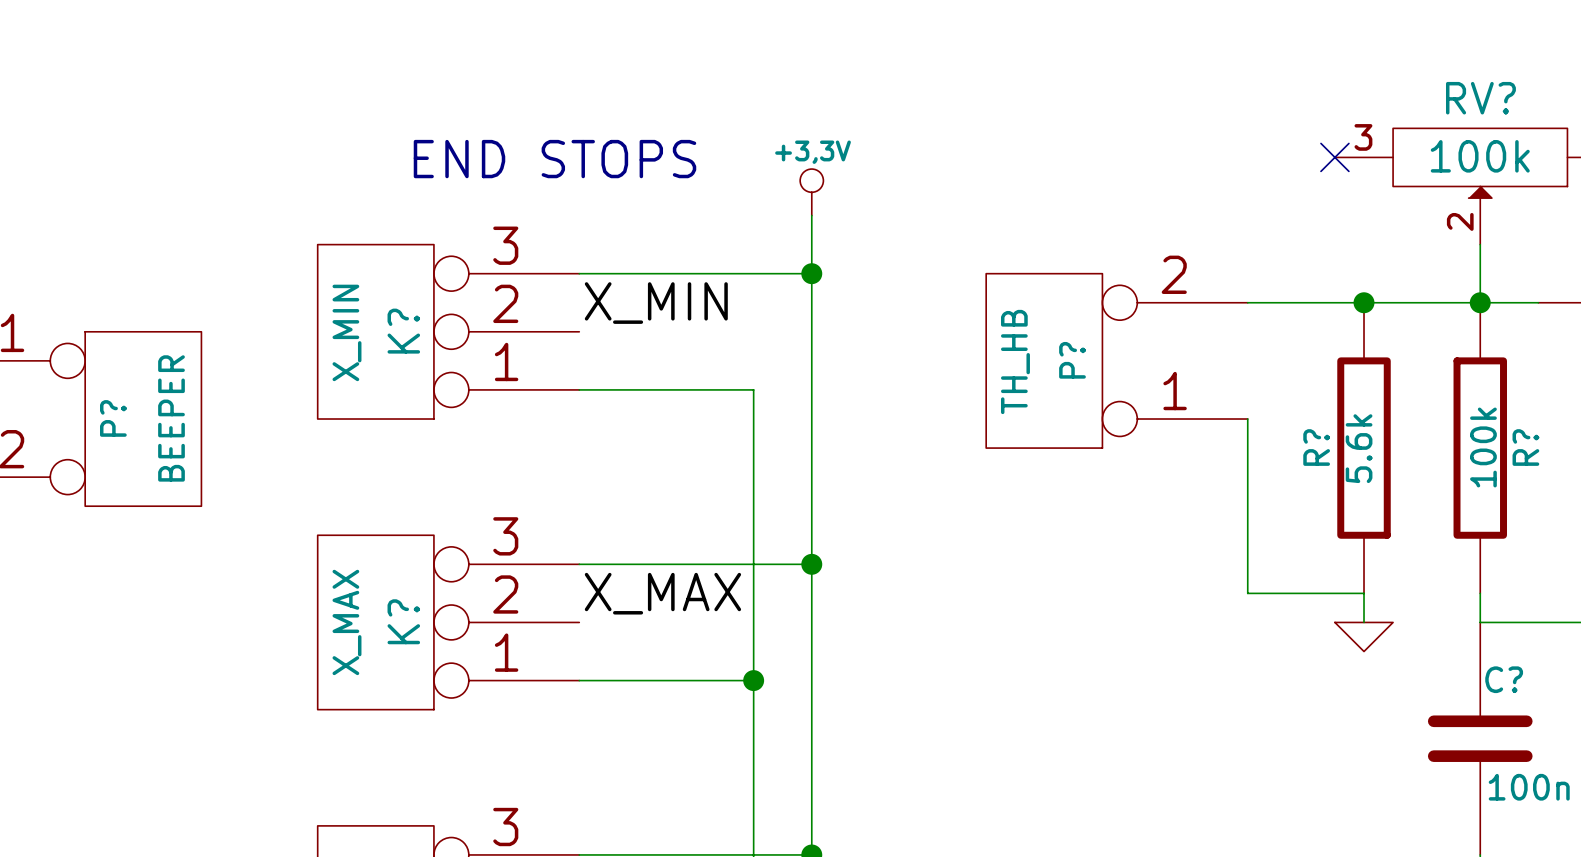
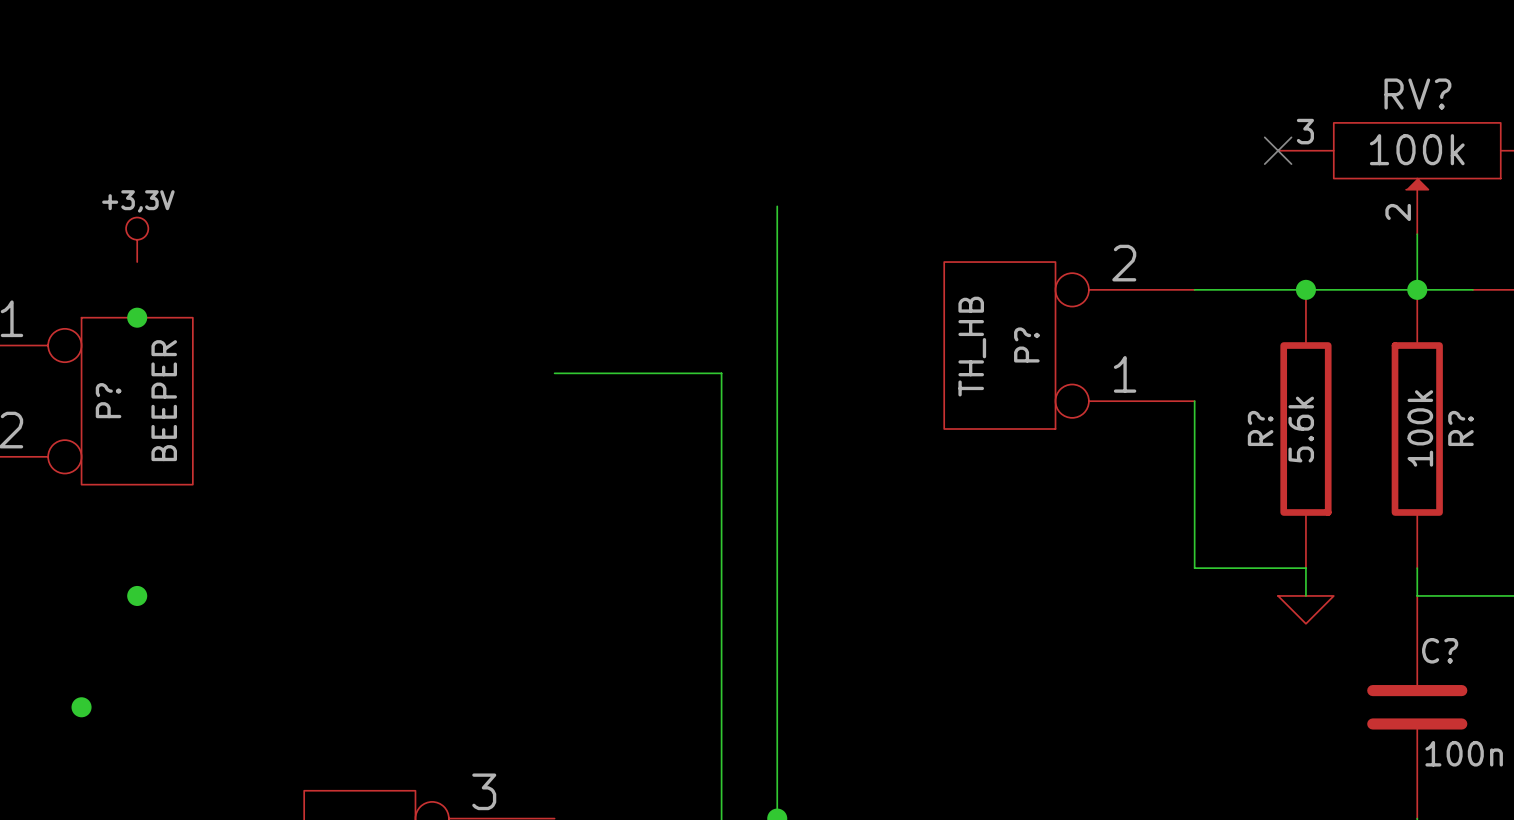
text: END STOPS (554, 159) -> none
power symbol: +3,3V (811, 192) -> none
power symbol: none -> +3,3V (137, 239)
wire: (579, 273) (811, 273) -> none
junction: (811, 273) -> none
label: X_MIN (656, 303) -> none
junction: none -> (137, 317)
K?: X_MIN (448, 331) -> none
wire: (579, 564) (811, 564) -> none
junction: (811, 564) -> none
label: X_MAX (662, 593) -> none
junction: none -> (137, 595)
K?: X_MAX (448, 622) -> none
wire: (579, 680) (753, 680) -> none
junction: (753, 680) -> none
junction: none -> (81, 707)
wire: (579, 854) (811, 854) -> none

